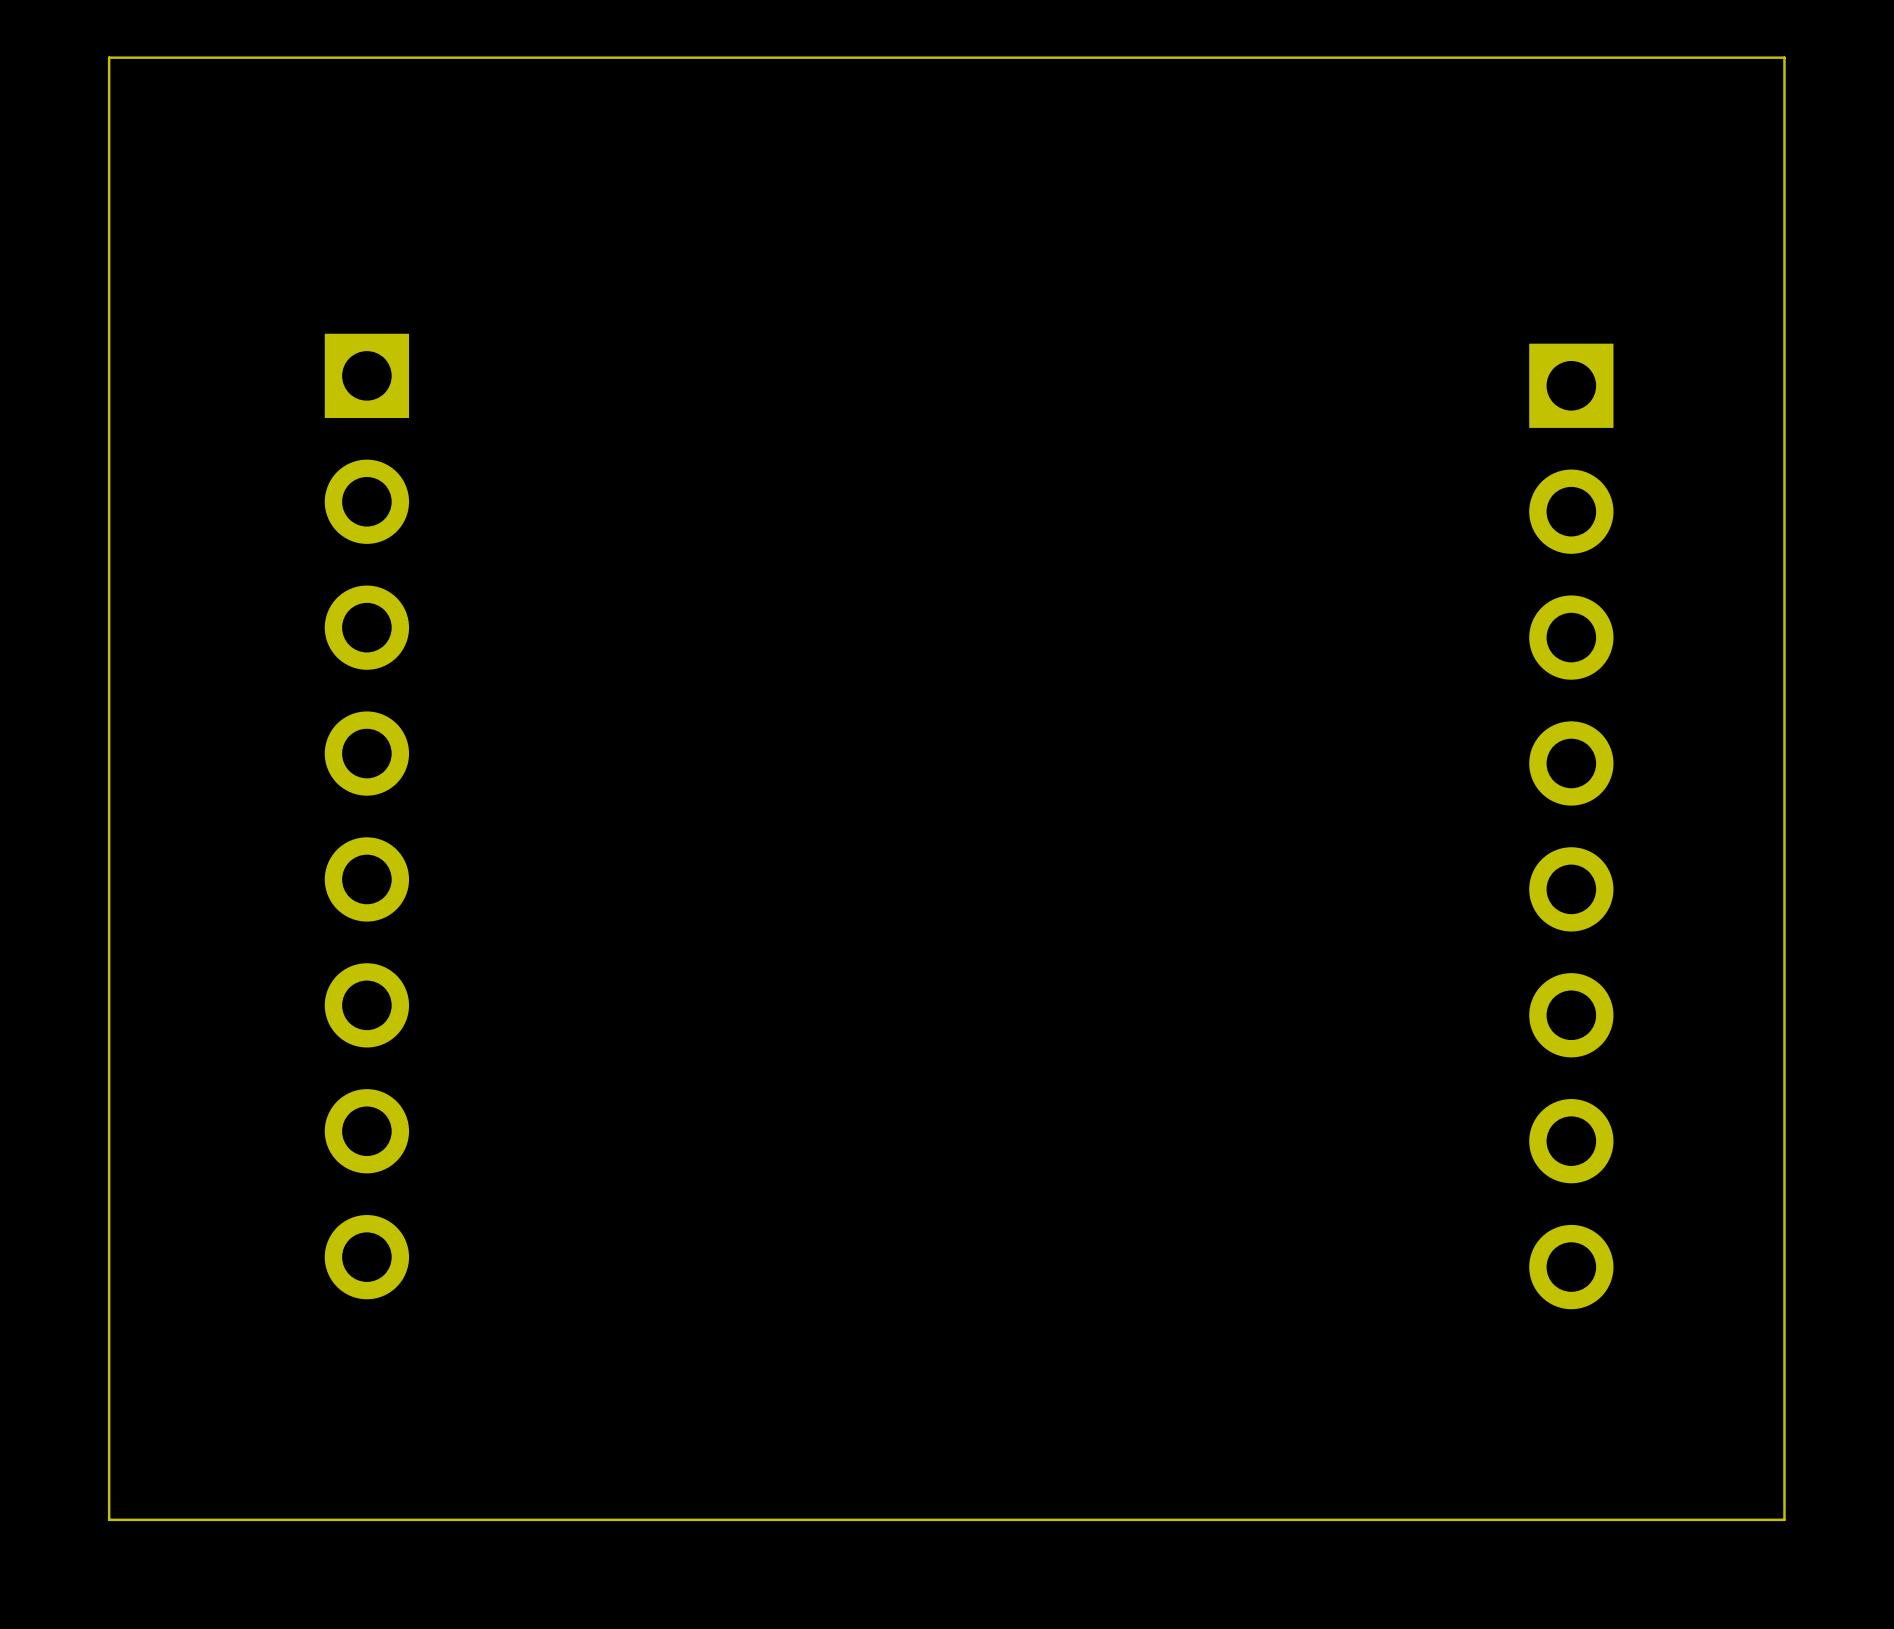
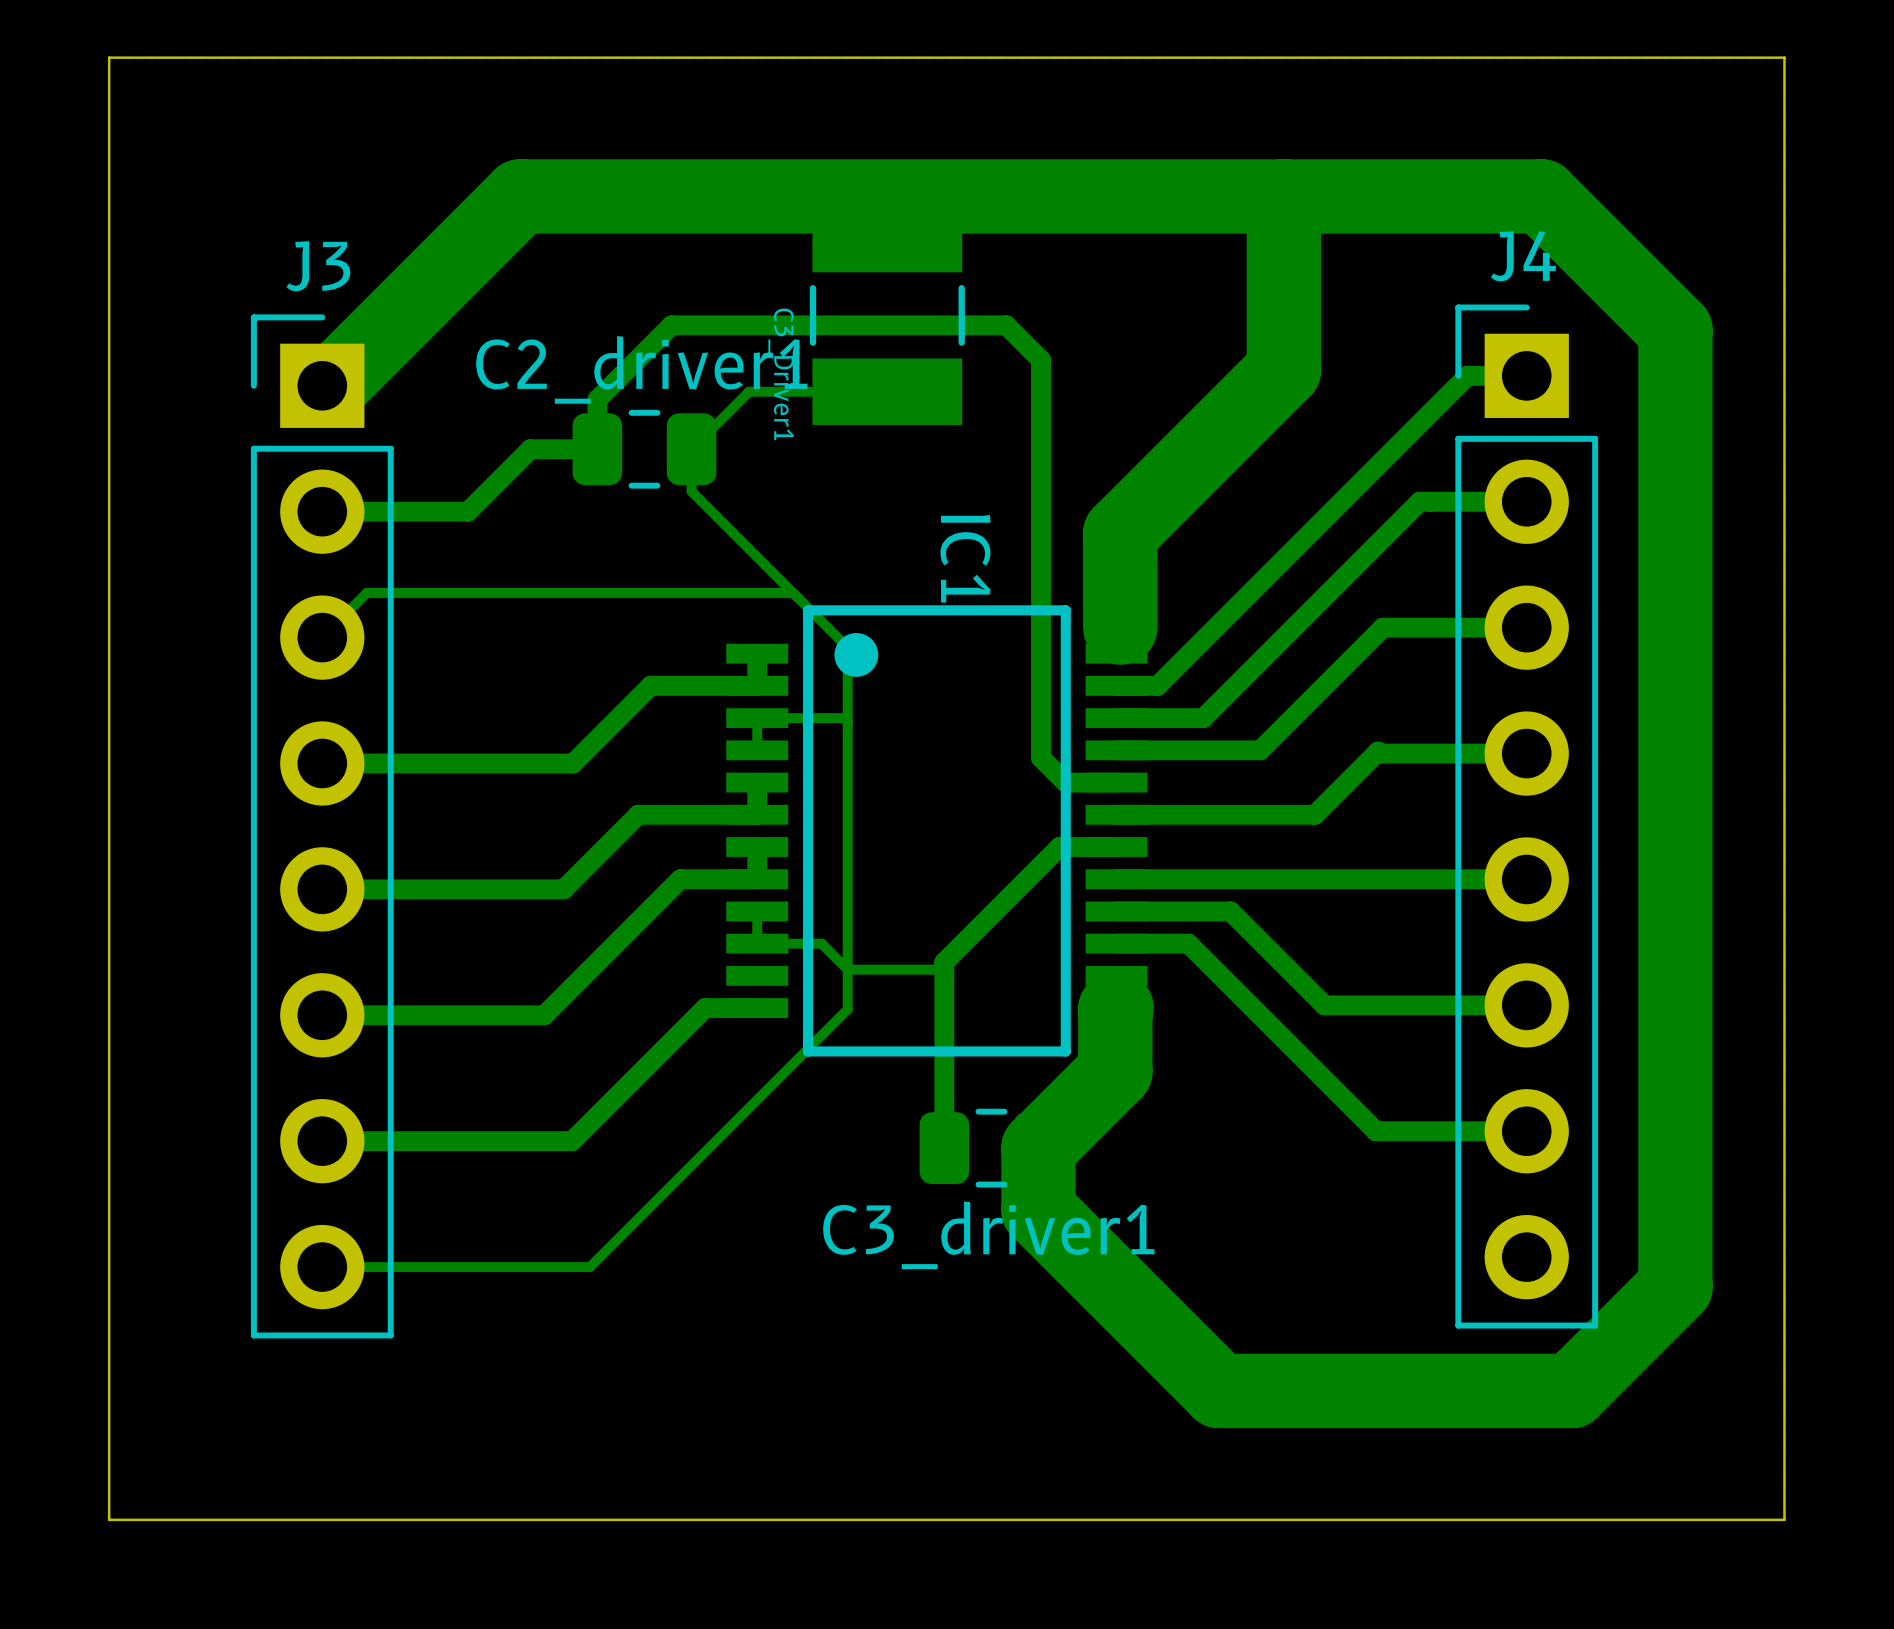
track: none -> (1283, 196) (1283, 369) (1120, 533) (1120, 627)
C3_Driver1: none -> (887, 315)
track: none -> (1526, 375) (1467, 375) (1157, 685) (1116, 685)
track: none -> (322, 385) (331, 385) (520, 196) (1541, 196) (1675, 330) (1675, 1286) (1571, 1390) (1219, 1390) (1038, 1210) (1038, 1148) (1115, 1071) (1116, 1008)
track: none -> (887, 391) (749, 391) (691, 449) (691, 491) (847, 647) (847, 1009) (589, 1267) (322, 1267)
C2_driver1: none -> (644, 449)
track: none -> (1526, 501) (1419, 501) (1203, 718) (1116, 718)
track: none -> (322, 511) (468, 511) (530, 449) (597, 449) (597, 399) (671, 325) (1006, 325) (1040, 360) (1040, 757) (1065, 782) (1116, 782)
track: none -> (793, 592) (366, 592) (322, 637)
track: none -> (1526, 627) (1382, 627) (1260, 750) (1116, 750)
track: none -> (757, 653) (757, 685) (650, 685) (573, 763) (322, 763)
track: none -> (847, 721) (843, 718) (757, 718) (757, 750)
track: none -> (1526, 753) (1380, 753) (1378, 751) (1314, 814) (1116, 814)
track: none -> (757, 782) (757, 814) (638, 814) (563, 889) (322, 889)
J4 side: top (366, 816) -> bottom (1526, 816)
J3: none -> (322, 826)
part: (1571, 826) -> none
IC1: none -> (936, 830)
track: none -> (757, 846) (757, 879) (680, 879) (544, 1015) (322, 1015)
track: none -> (1116, 846) (1059, 846) (944, 962)
track: none -> (1526, 879) (1116, 879)
track: none -> (757, 911) (757, 943) (821, 943) (847, 969) (936, 969) (944, 962)
track: none -> (1116, 911) (1230, 911) (1324, 1005) (1526, 1005)
track: none -> (1116, 943) (1188, 943) (1376, 1131) (1526, 1131)
track: none -> (944, 962) (944, 1148)
track: none -> (757, 1008) (705, 1008) (572, 1141) (322, 1141)
C3_driver1: none -> (991, 1148)

